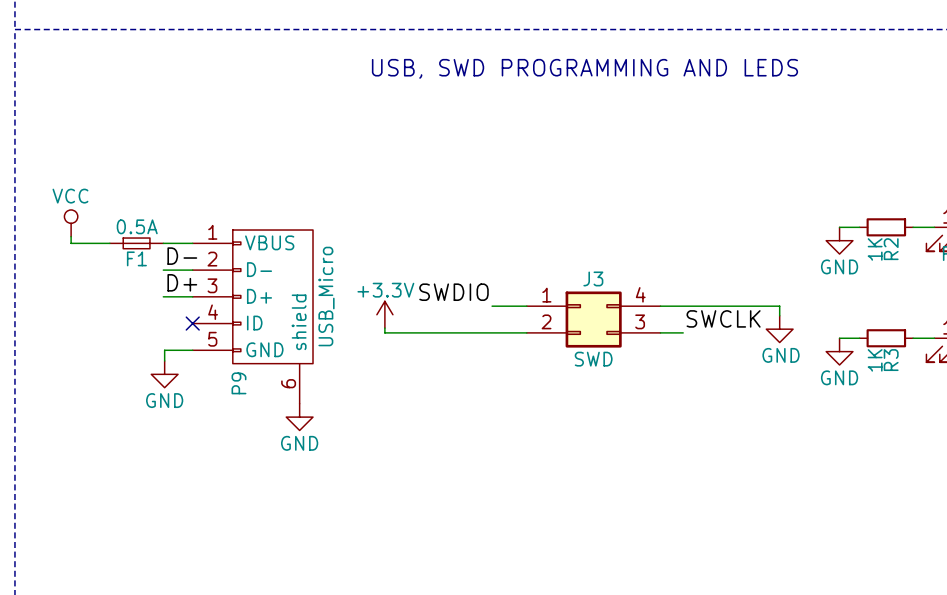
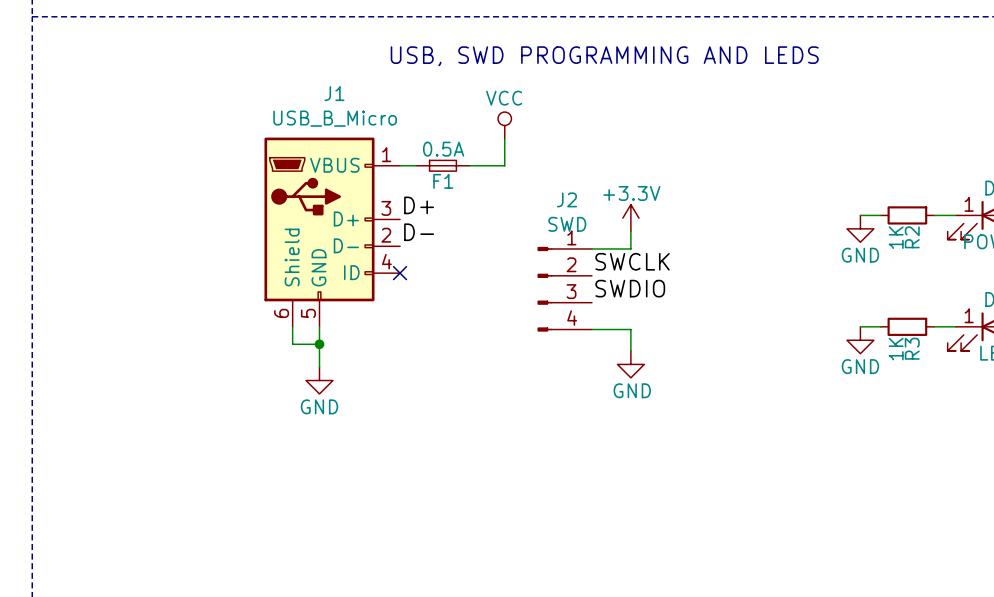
power symbol: none -> VCC (504, 125)
wire: none -> (504, 138) (504, 165) (469, 165)
wire: none -> (400, 165) (416, 165)
power symbol: VCC (71, 223) -> none
wire: (71, 236) (71, 243) (109, 243) -> none
F1 position: (136, 243) -> (442, 165)
wire: (163, 243) (192, 243) -> none
wire: none -> (630, 231) (630, 248) (591, 248)
J1: none -> USB_B_Micro (332, 232)
label position: D- (182, 256) -> D- (419, 232)
wire: (163, 270) (192, 270) -> none
label position: D+ (182, 282) -> D+ (419, 205)
no-connect mark: none -> (400, 273)
label position: SWDIO (453, 292) -> SWDIO (630, 288)
wire: (163, 296) (192, 296) -> none
J2: none -> SWD (564, 289)
wire: (492, 306) (526, 306) -> none
wire: (660, 306) (779, 306) (779, 315) -> none
power symbol position: +3.3V (384, 314) -> +3.3V (630, 218)
P9: USB_Micro (252, 316) -> none
label position: SWCLK (723, 318) -> SWCLK (632, 261)
J3: SWD (593, 319) -> none
no-connect mark: (192, 323) -> none
wire: (384, 328) (384, 332) (526, 332) -> none
power symbol: GND (779, 329) -> none
wire: (660, 332) (683, 332) -> none
wire: none -> (292, 326) (292, 344) (319, 344)
wire: none -> (319, 326) (319, 367)
wire: (192, 350) (164, 350) (164, 360) -> none
junction: none -> (319, 344)
power symbol: GND (164, 374) -> none
power symbol: none -> GND (630, 364)
power symbol position: GND (299, 417) -> GND (319, 380)

